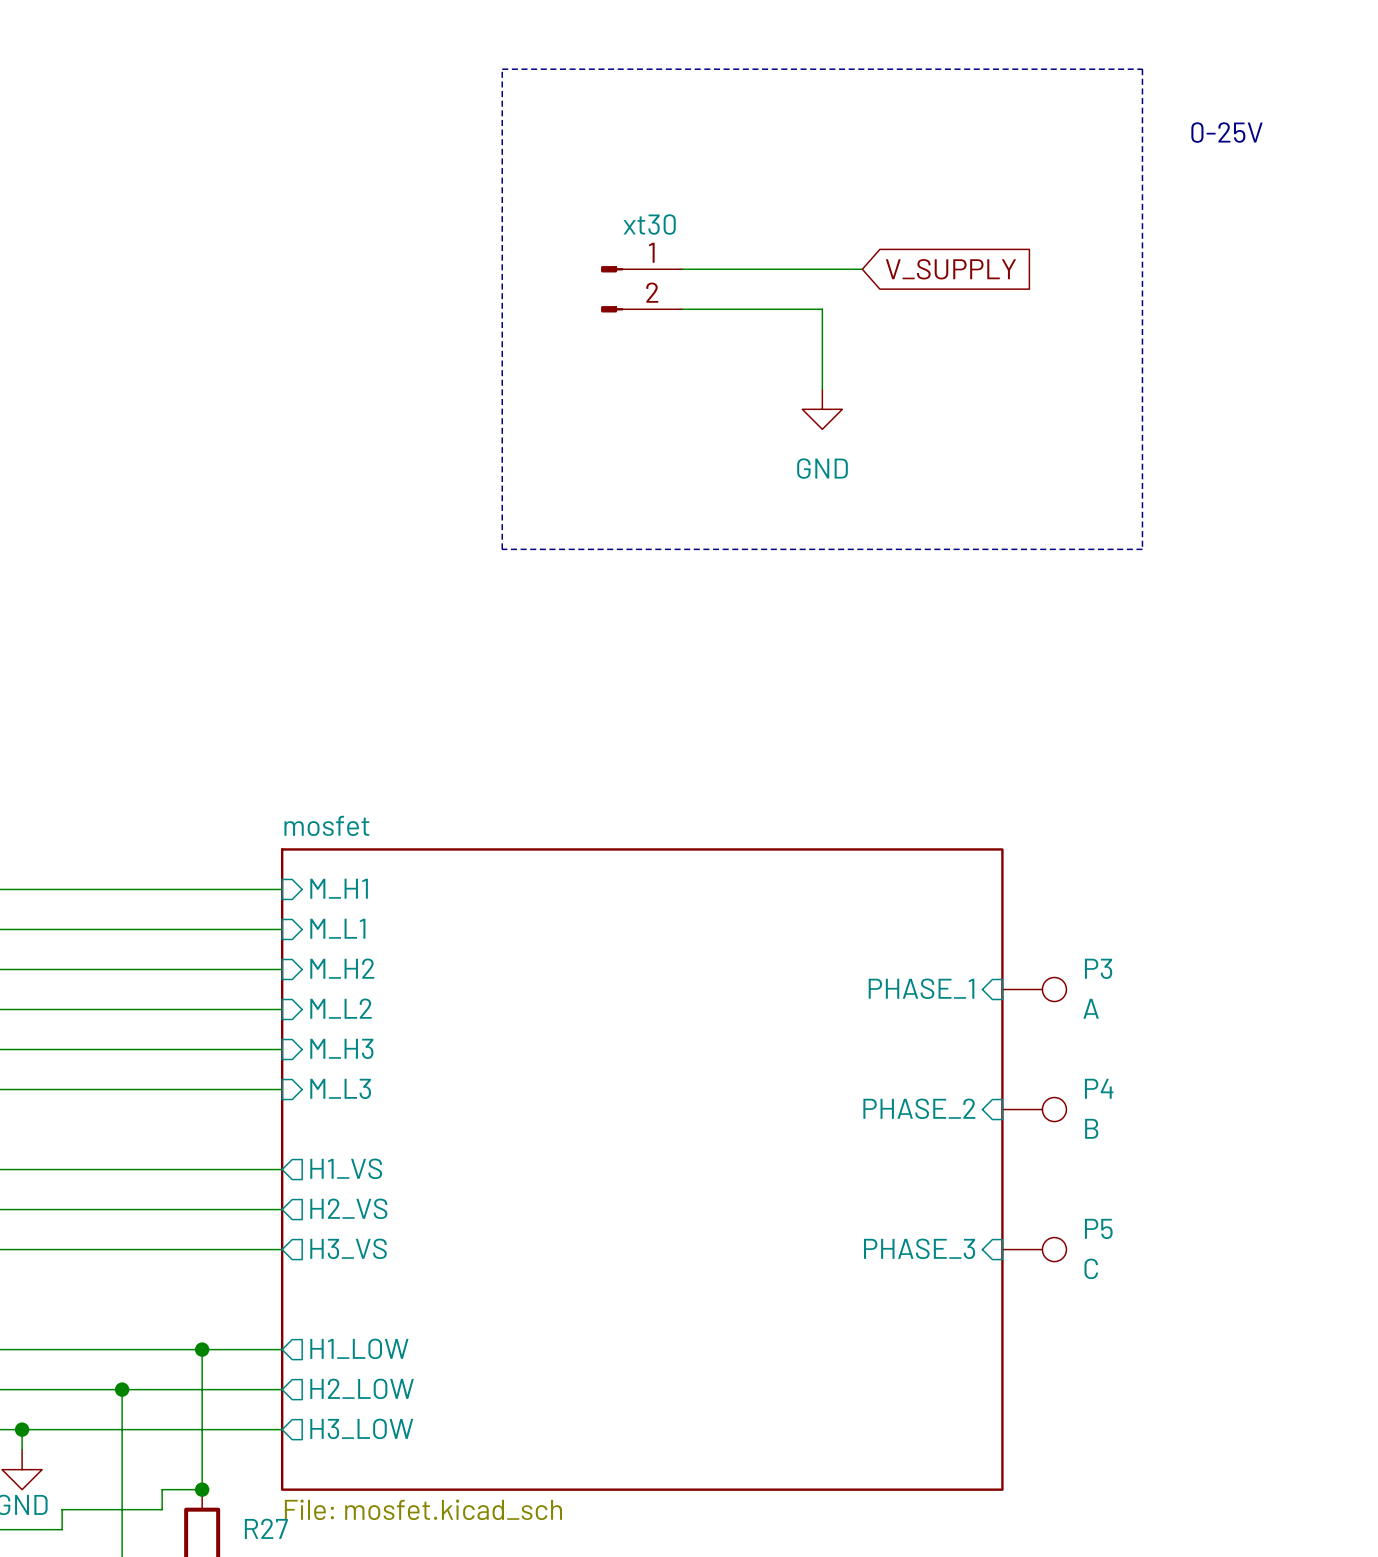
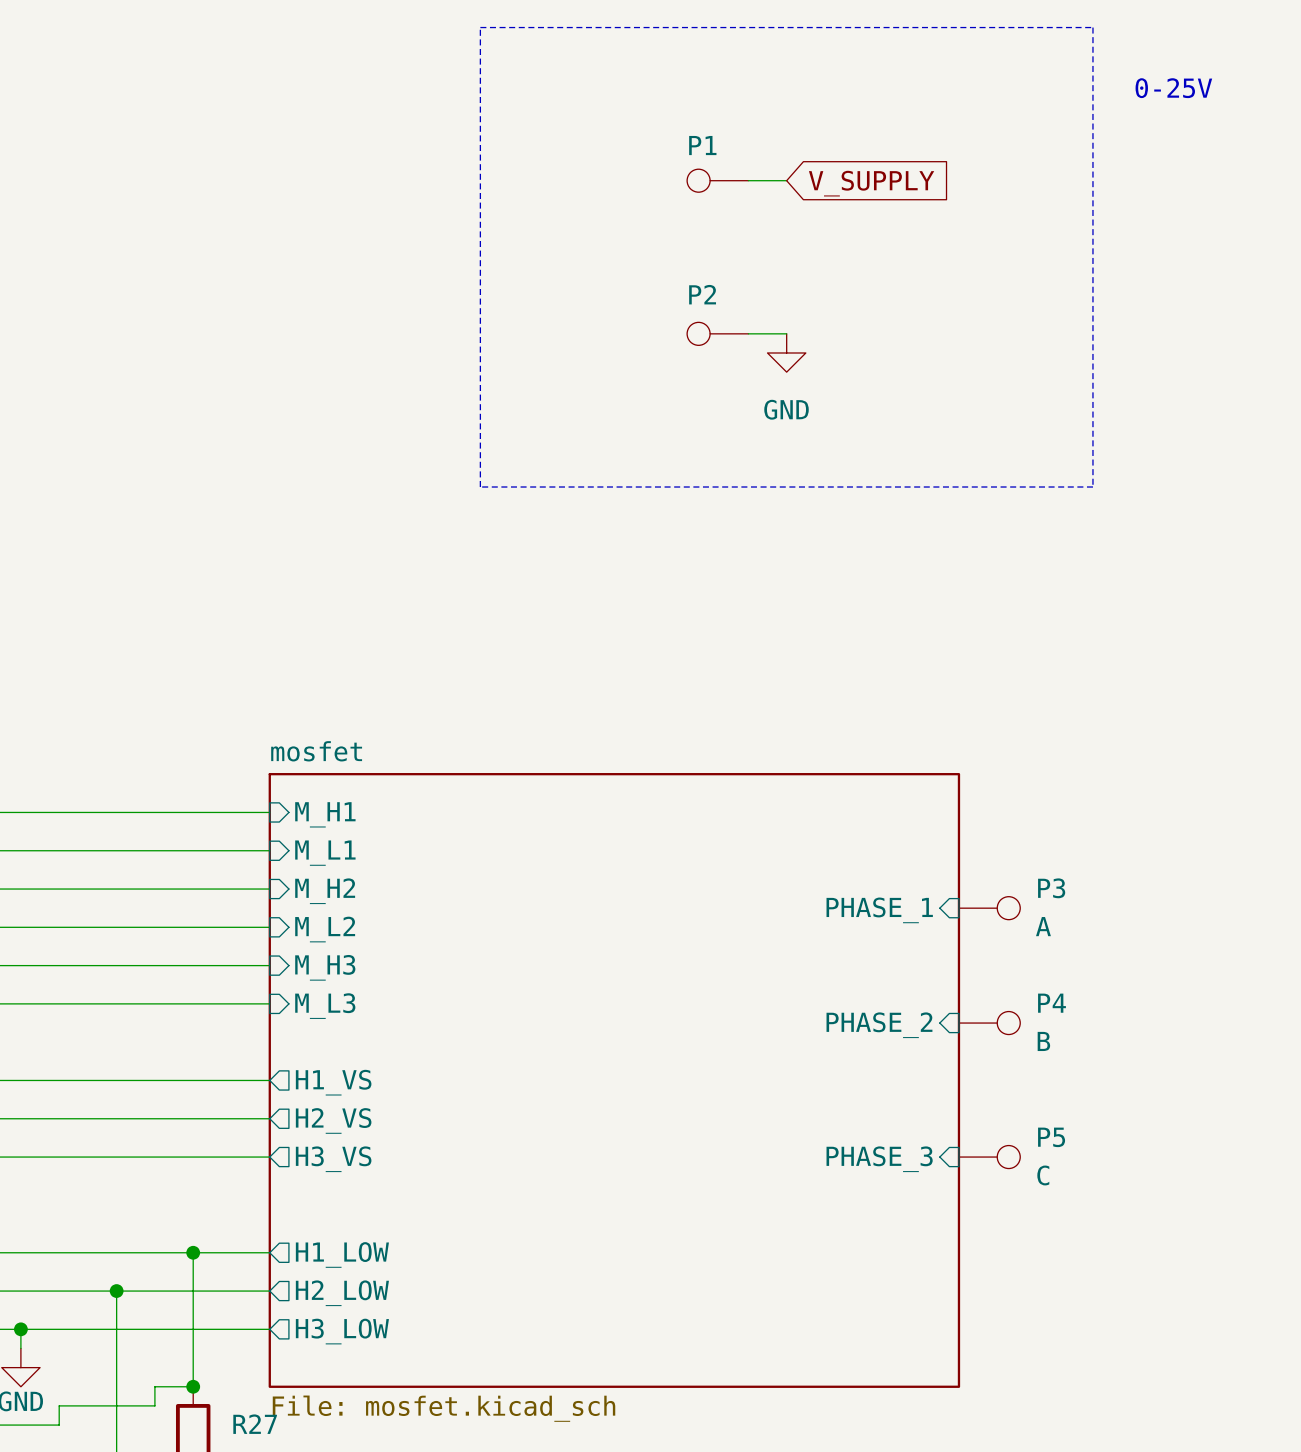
P1: none -> (717, 180)
wire: none -> (748, 180) (786, 180)
wire: (682, 269) (862, 269) -> none
global label position: V_SUPPLY (950, 269) -> V_SUPPLY (871, 183)
xt30: (641, 289) -> none
wire: (682, 309) (822, 309) (822, 389) -> (748, 333) (786, 333)
P2: none -> (717, 333)

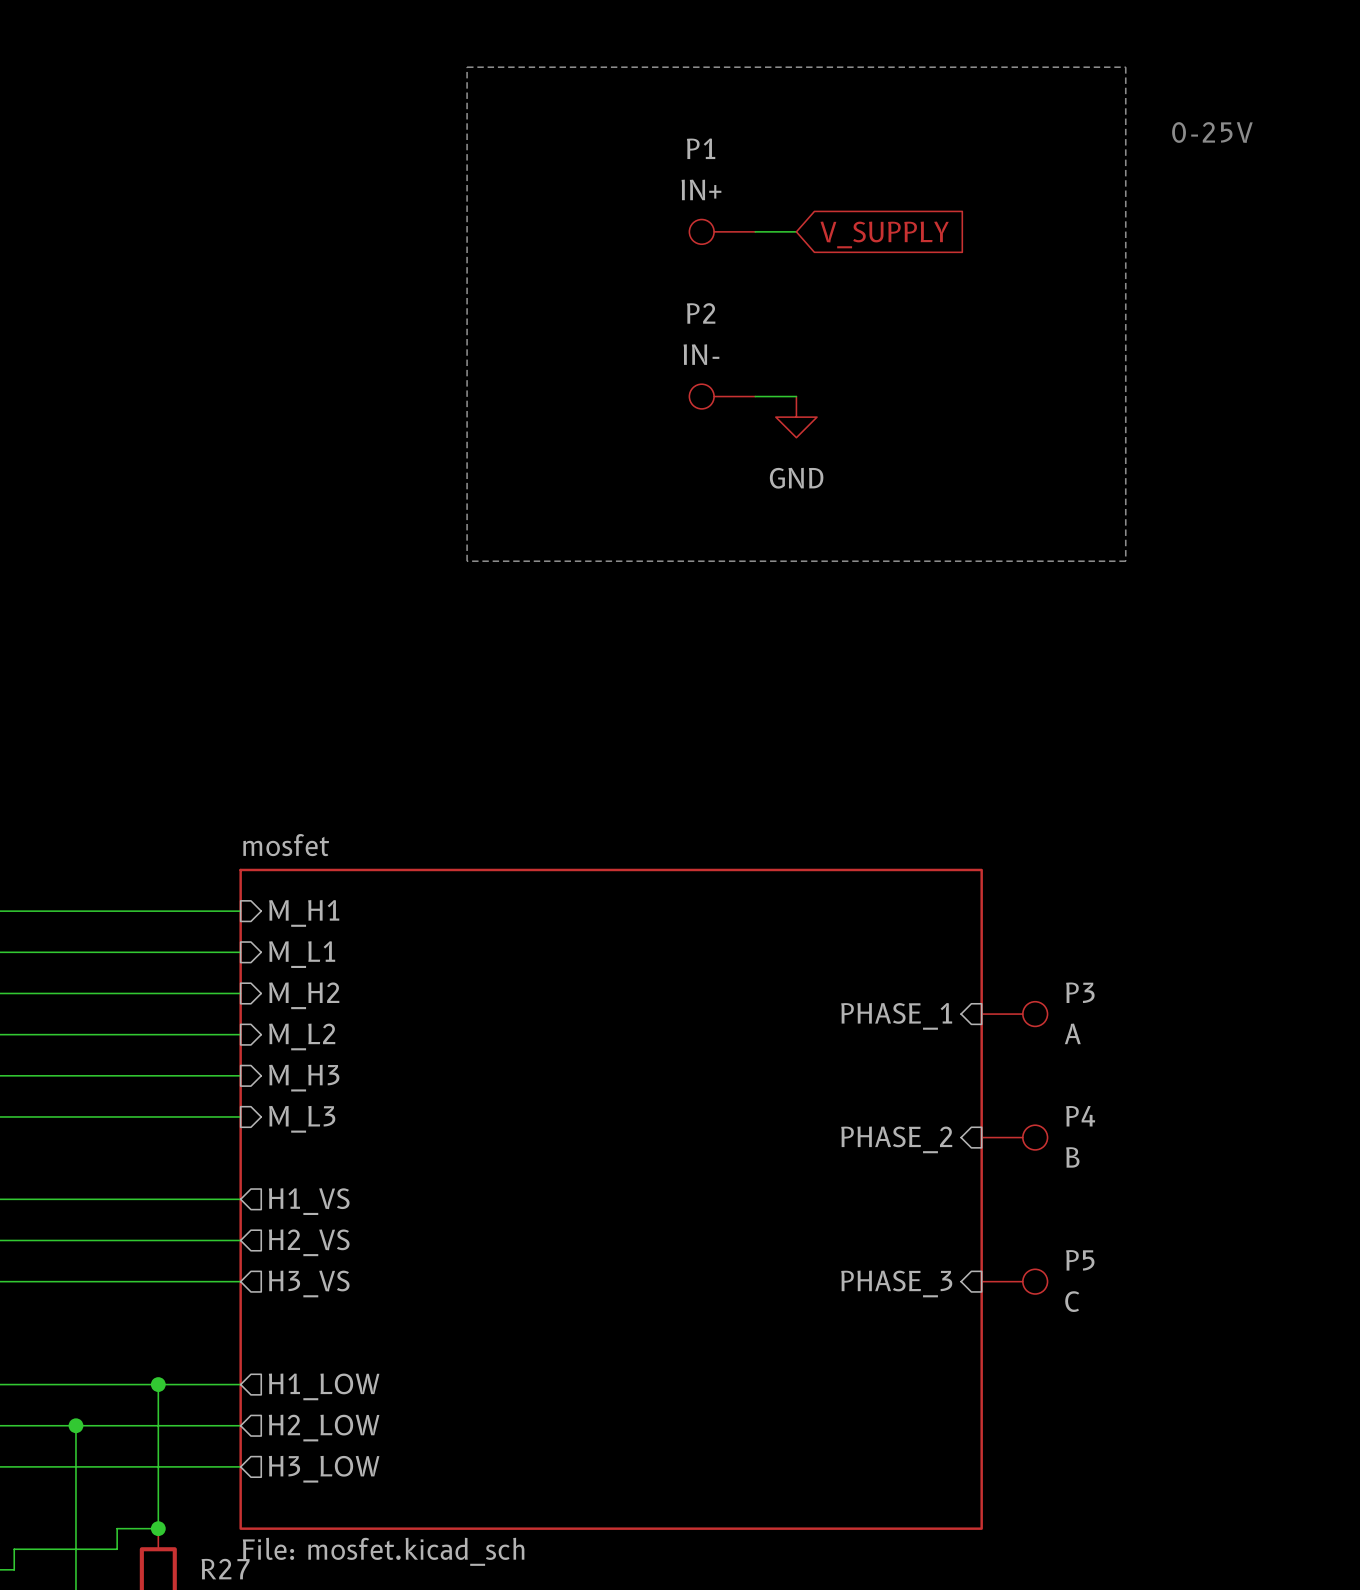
P1 value: none -> IN+ (701, 189)
P1 name position: P1 (702, 145) -> P1 (701, 148)
P2 value: none -> IN- (701, 354)
P2 name position: P2 (702, 294) -> P2 (701, 313)

